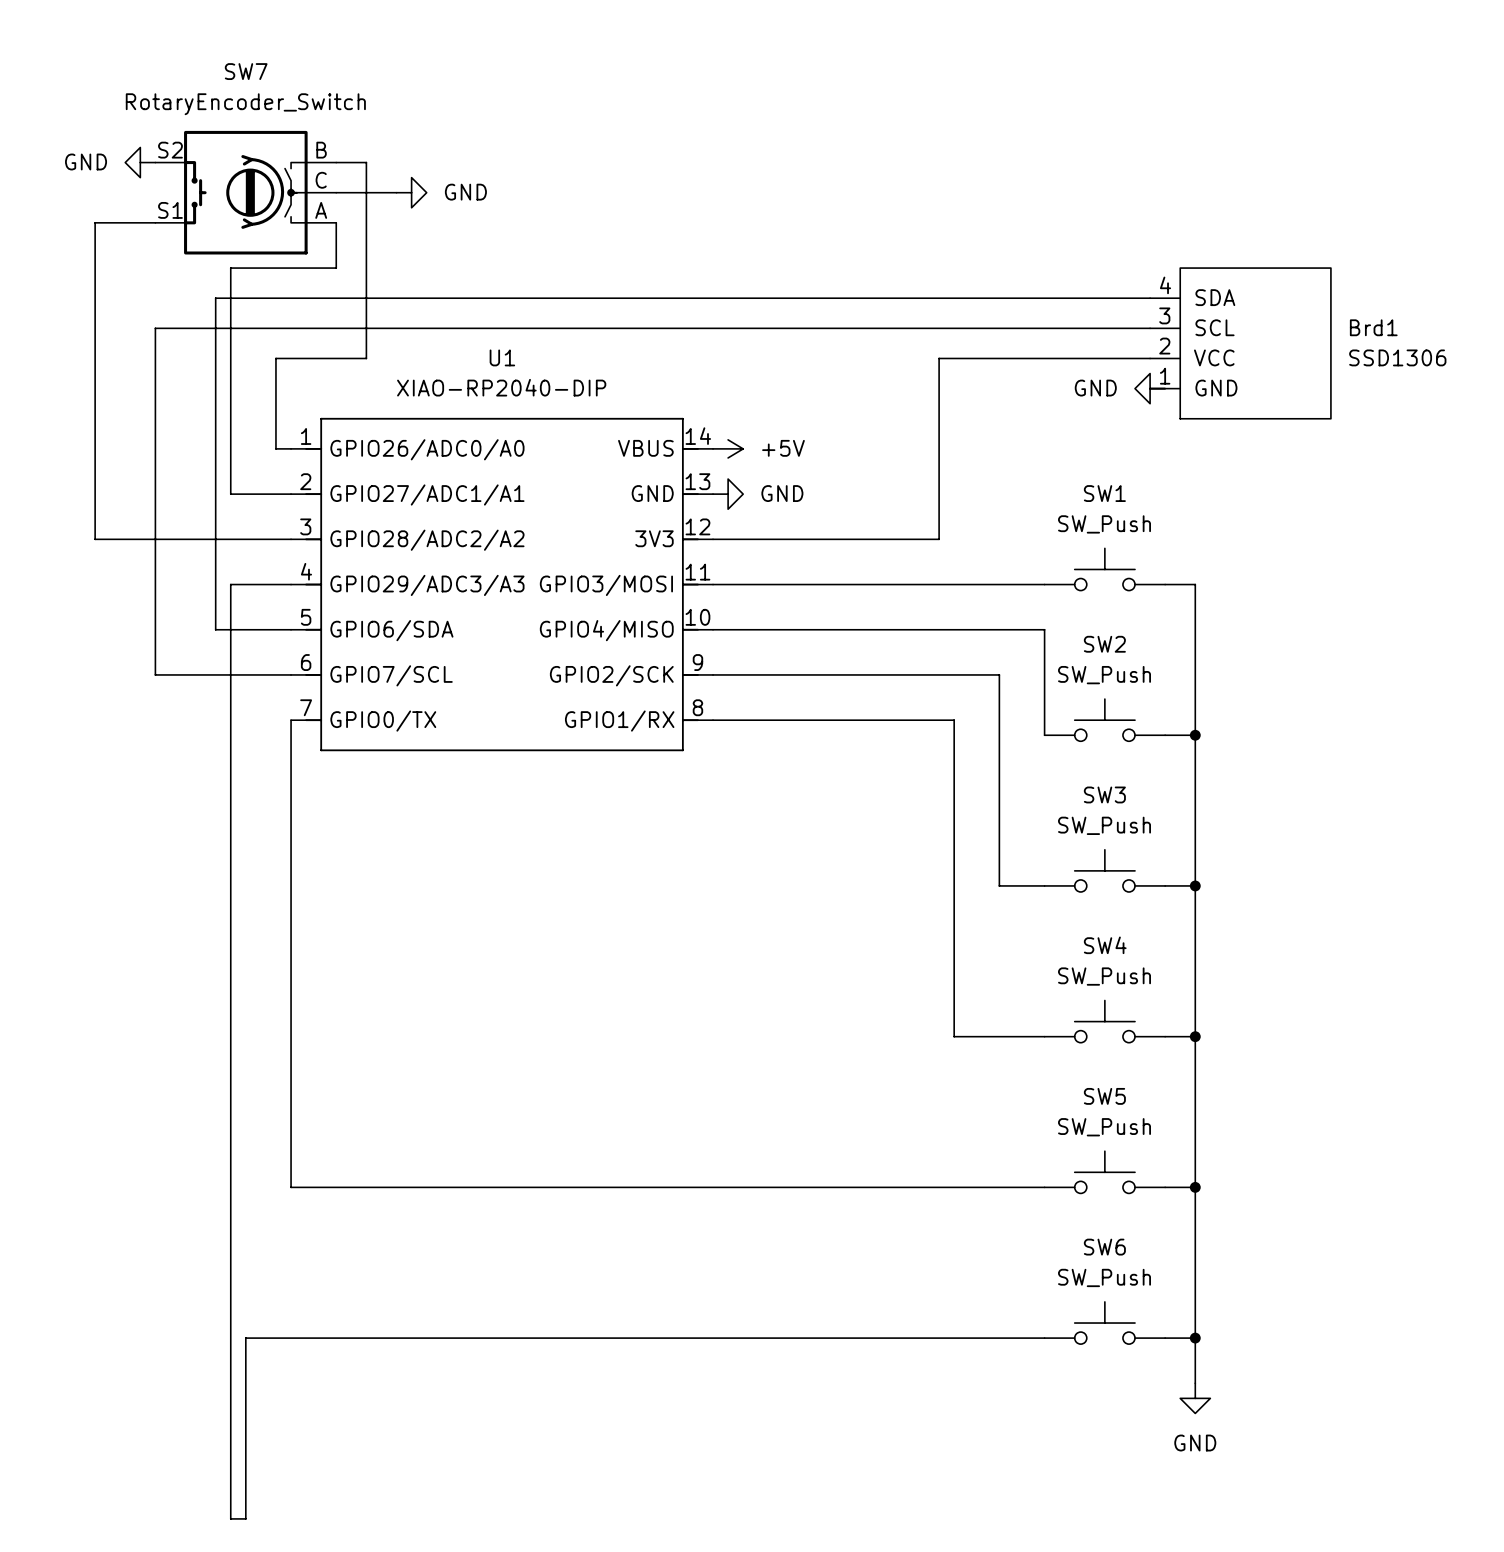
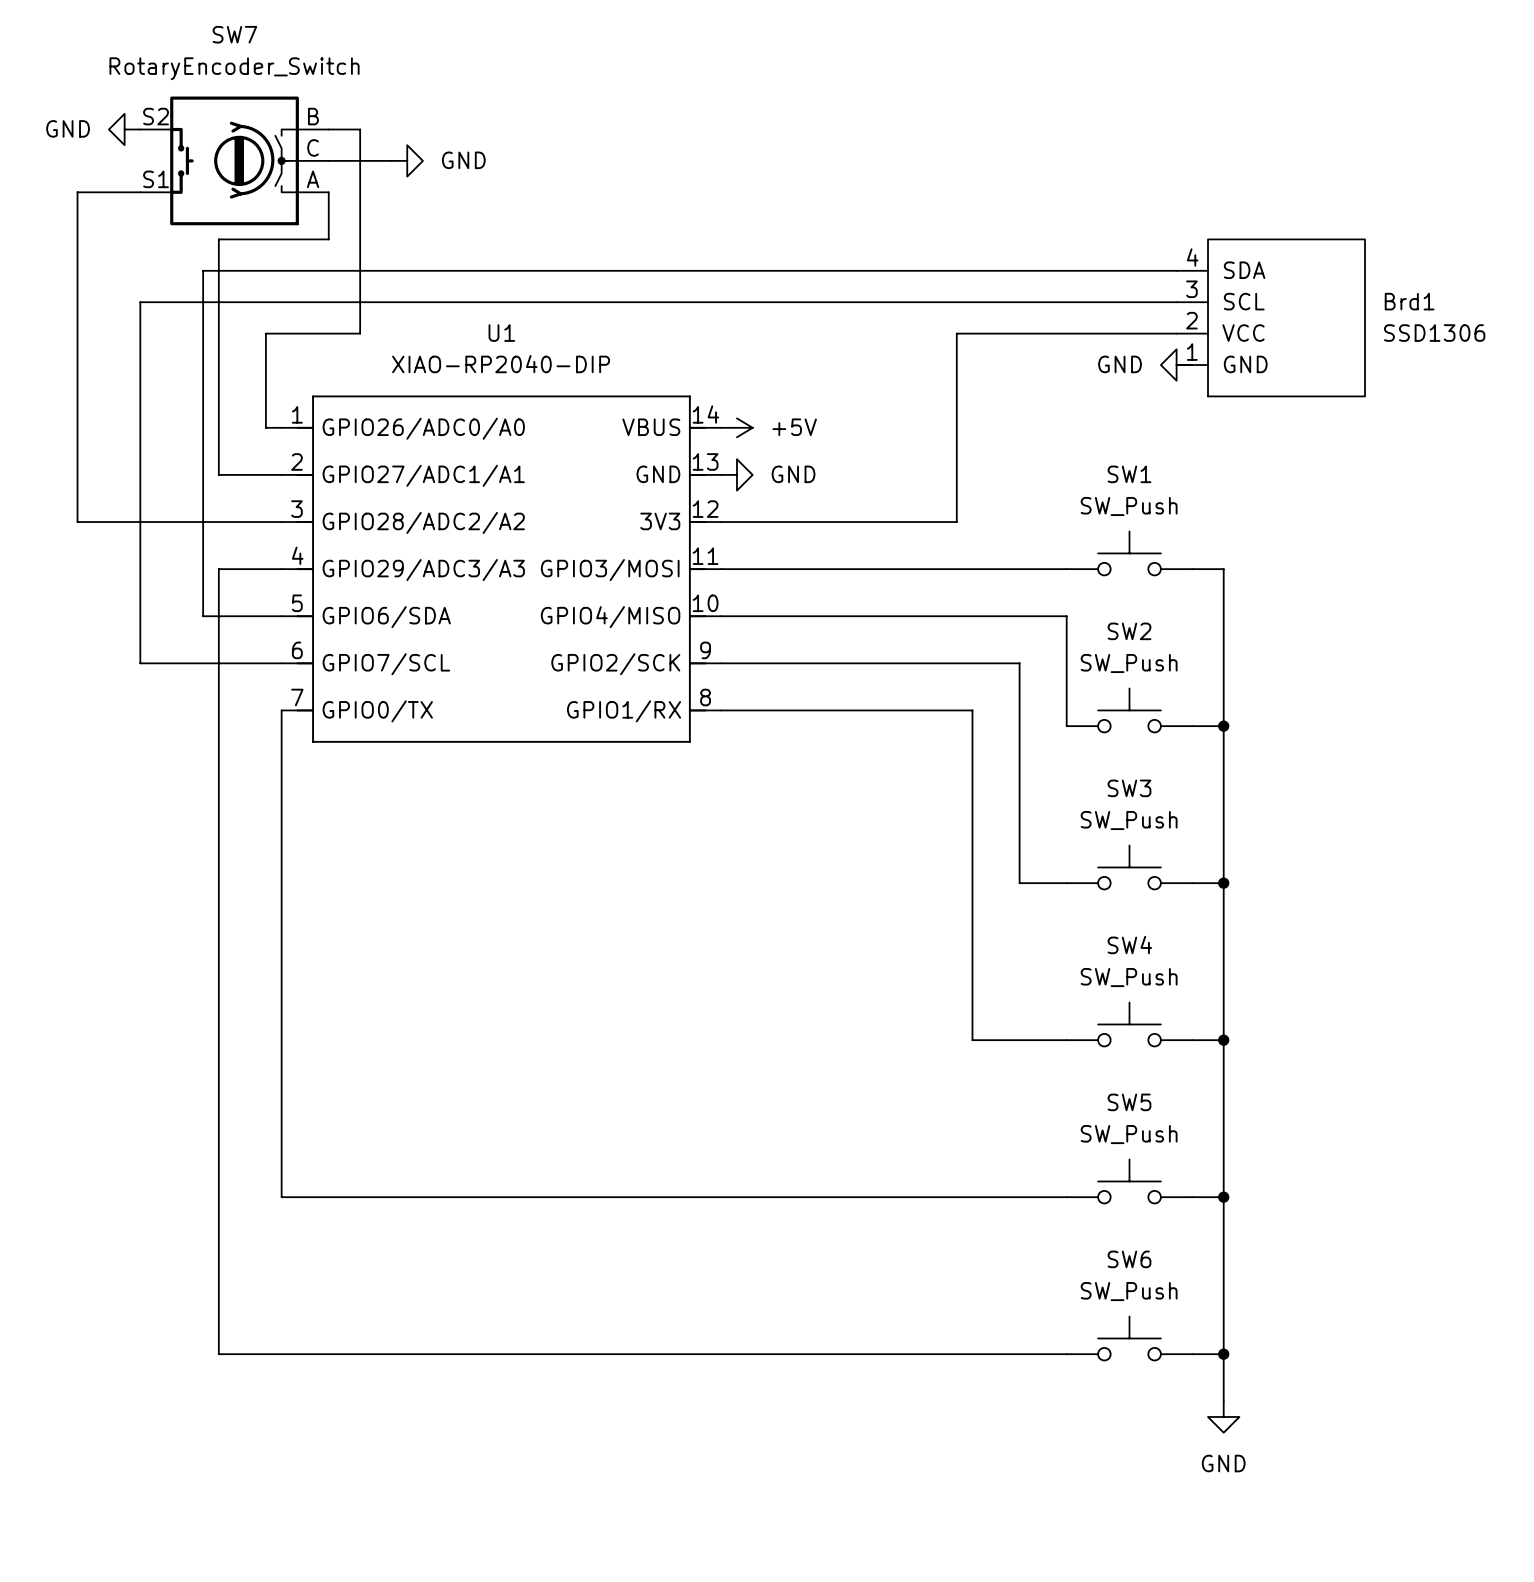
wire: (230, 1338) (230, 1518) (245, 1518) (245, 1338) -> (218, 1354) (234, 1354)

